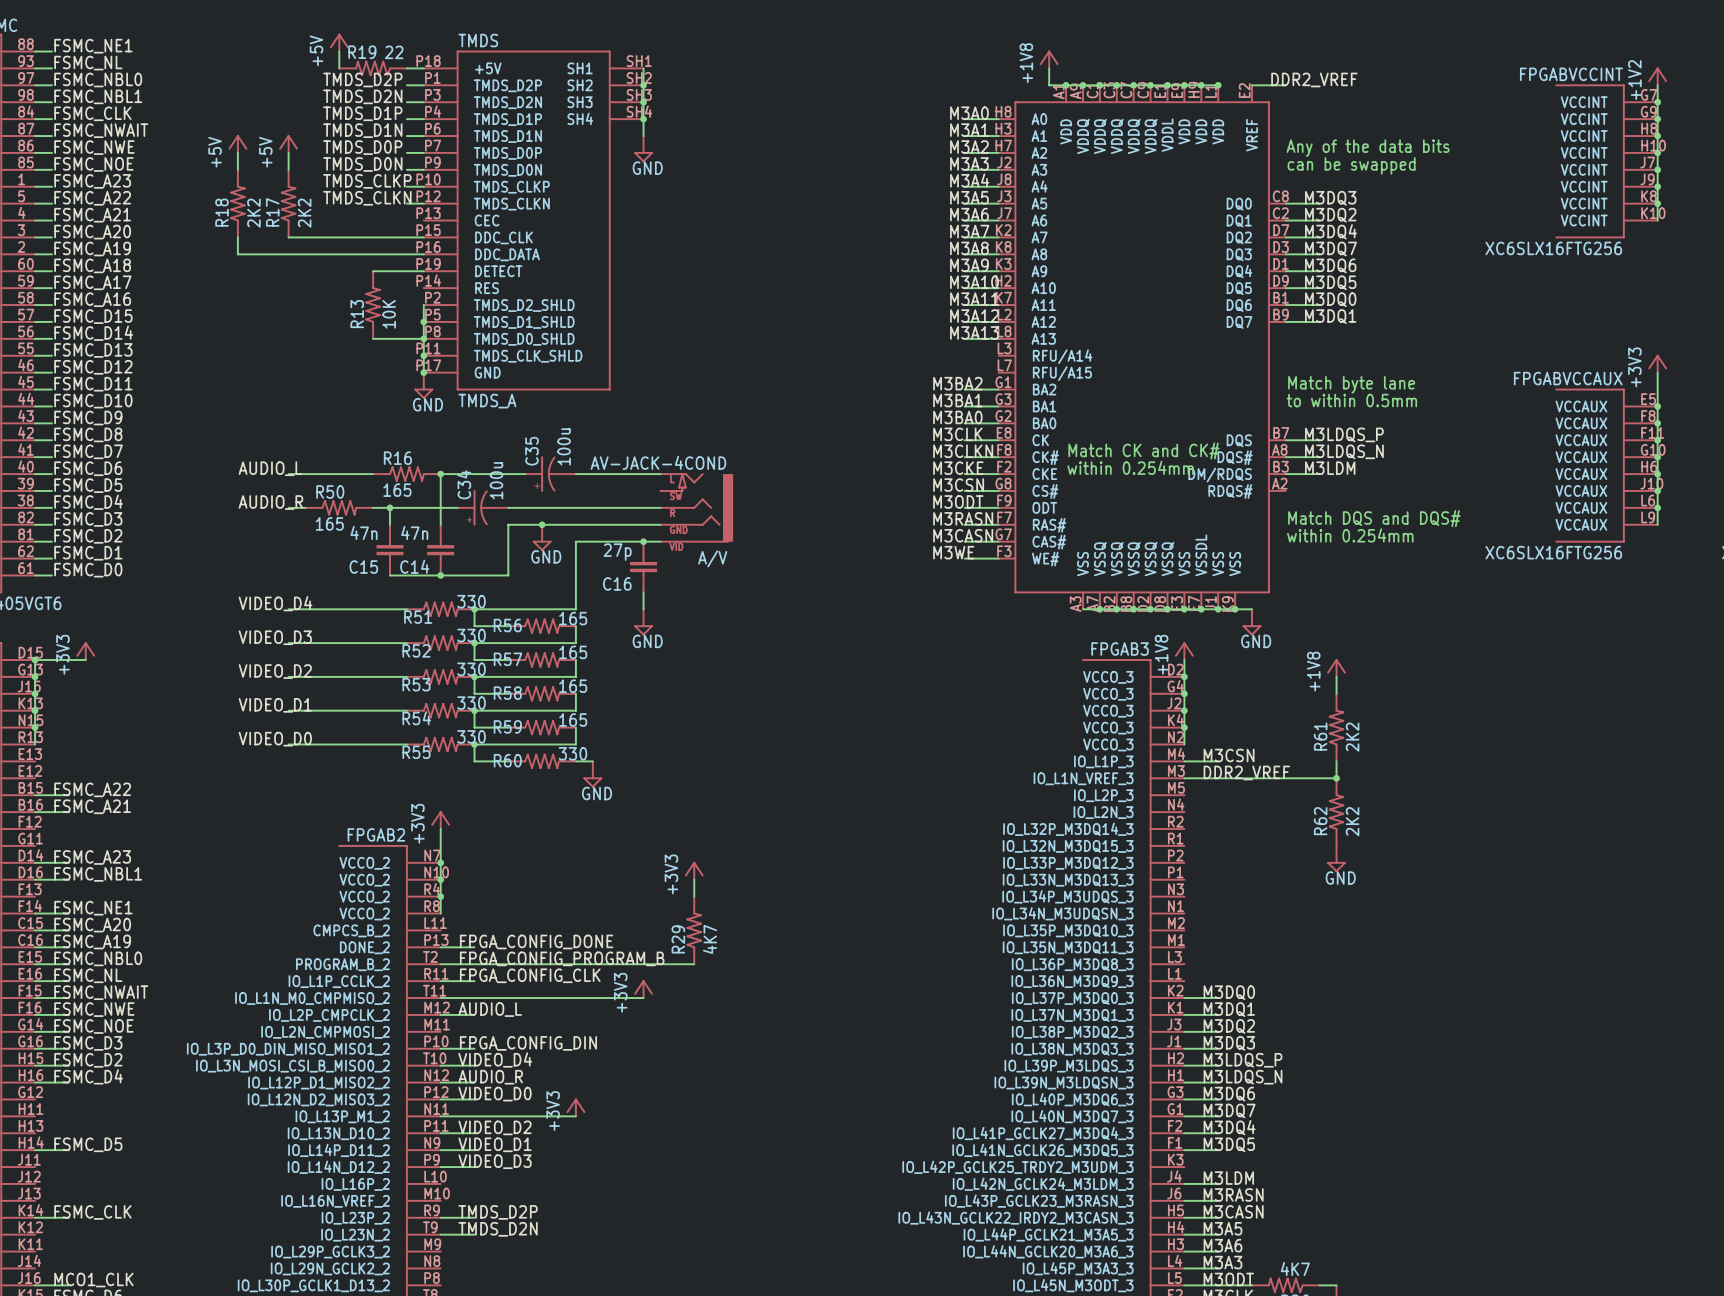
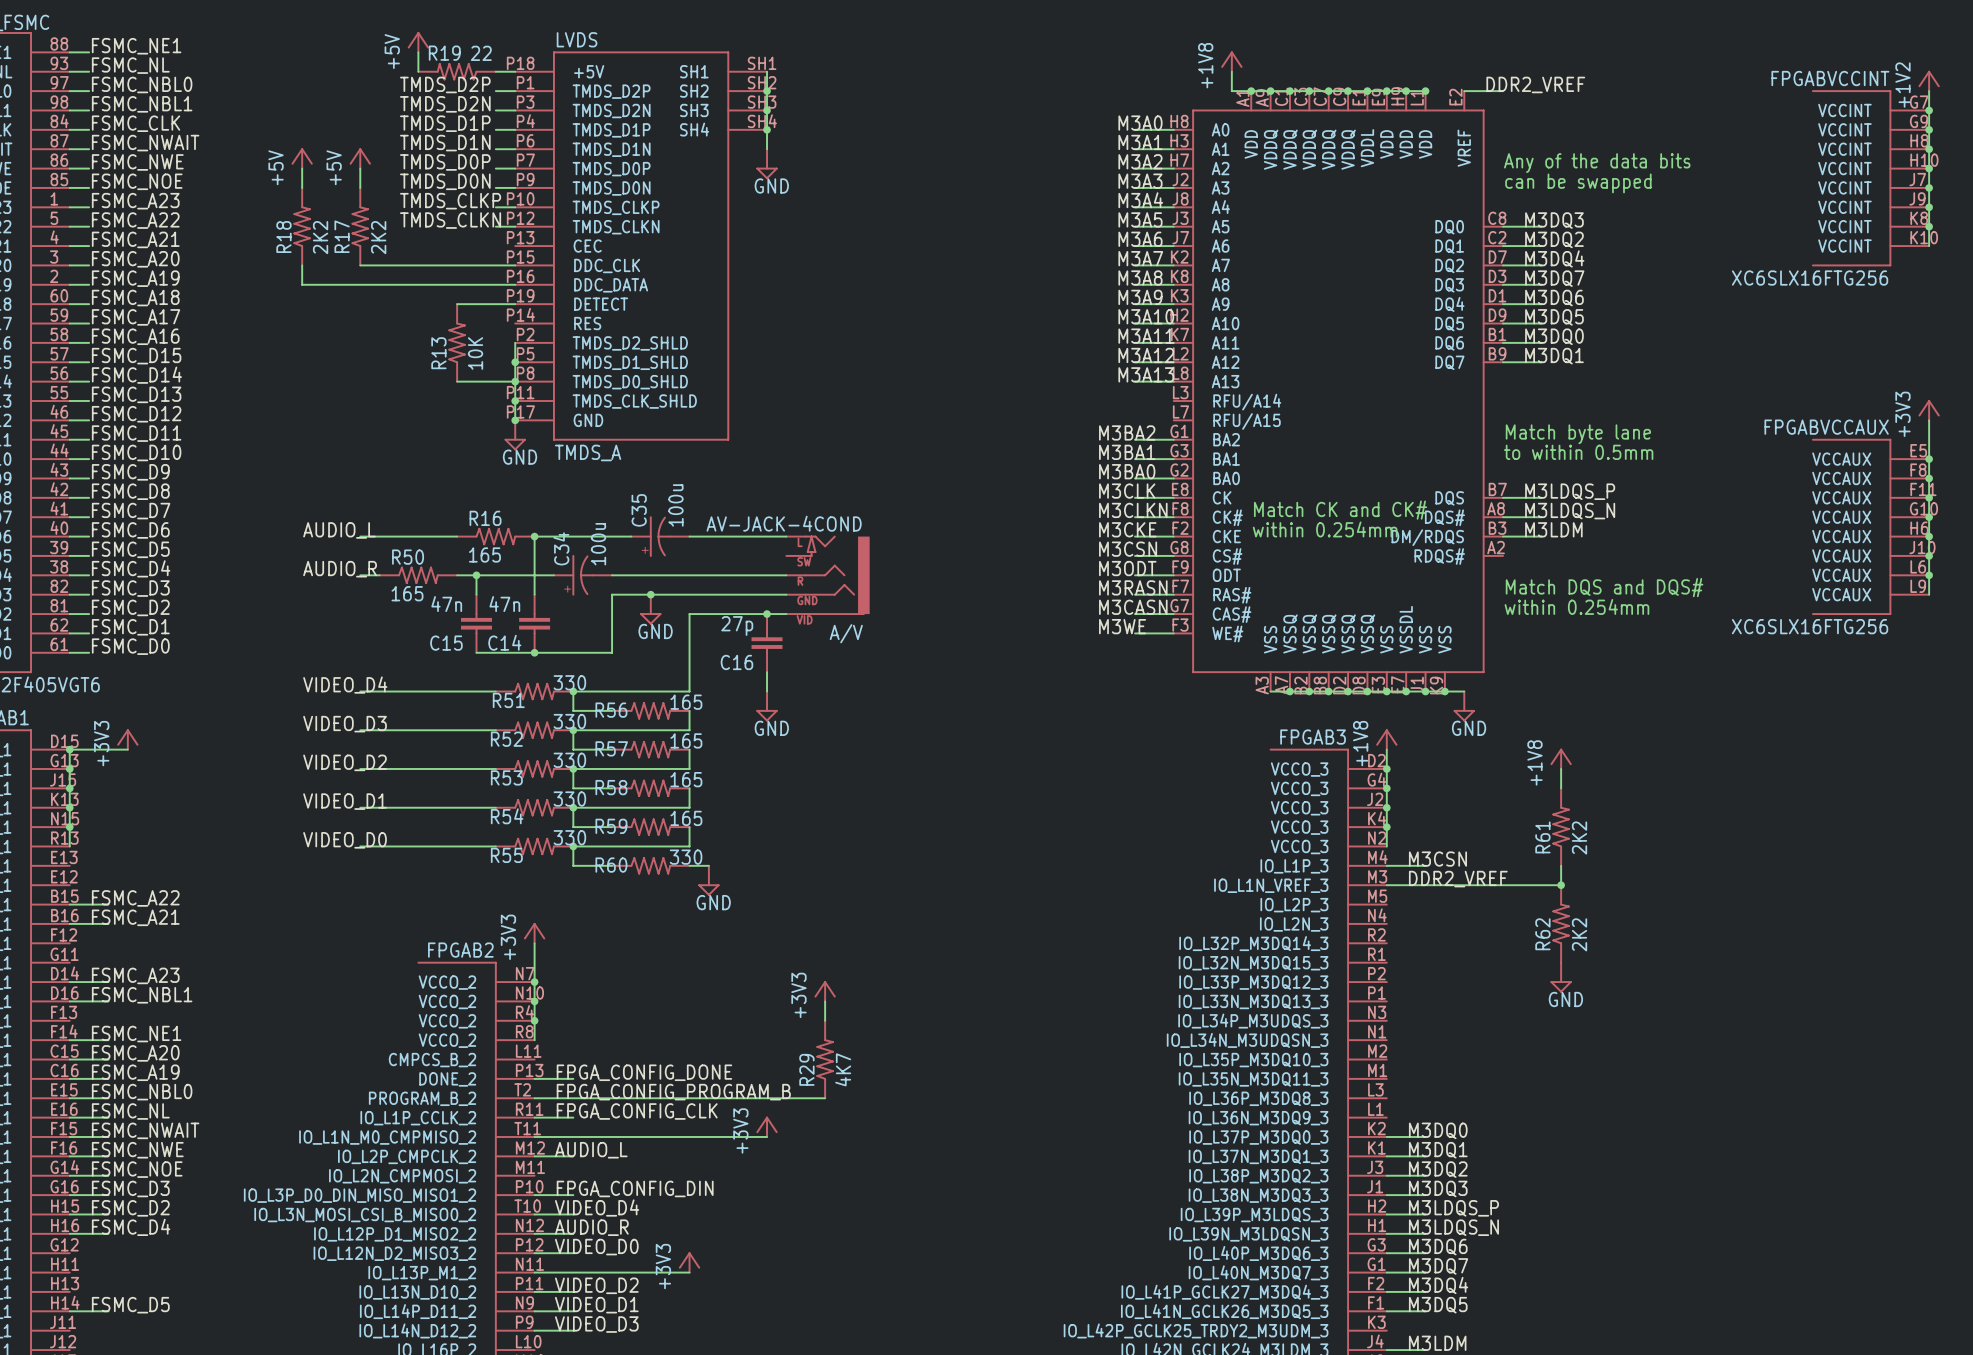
TMDS name: TMDS (478, 40) -> LVDS (577, 39)

